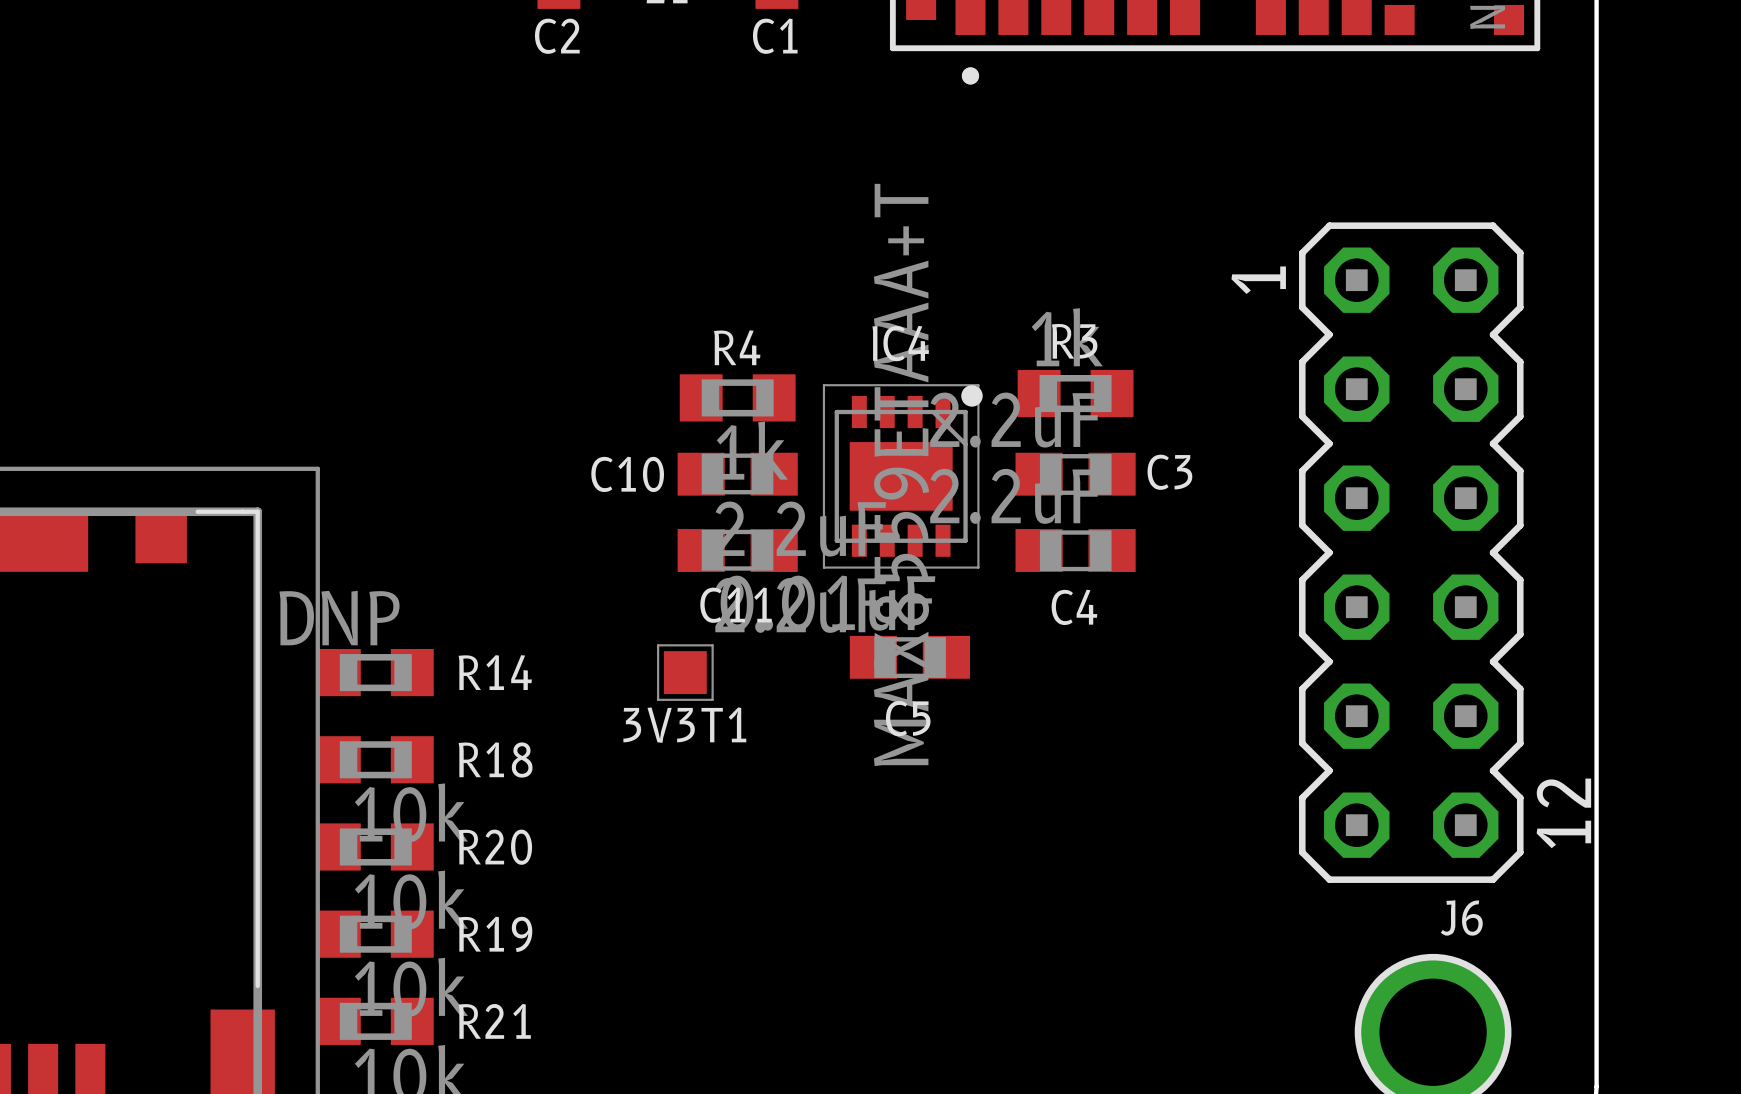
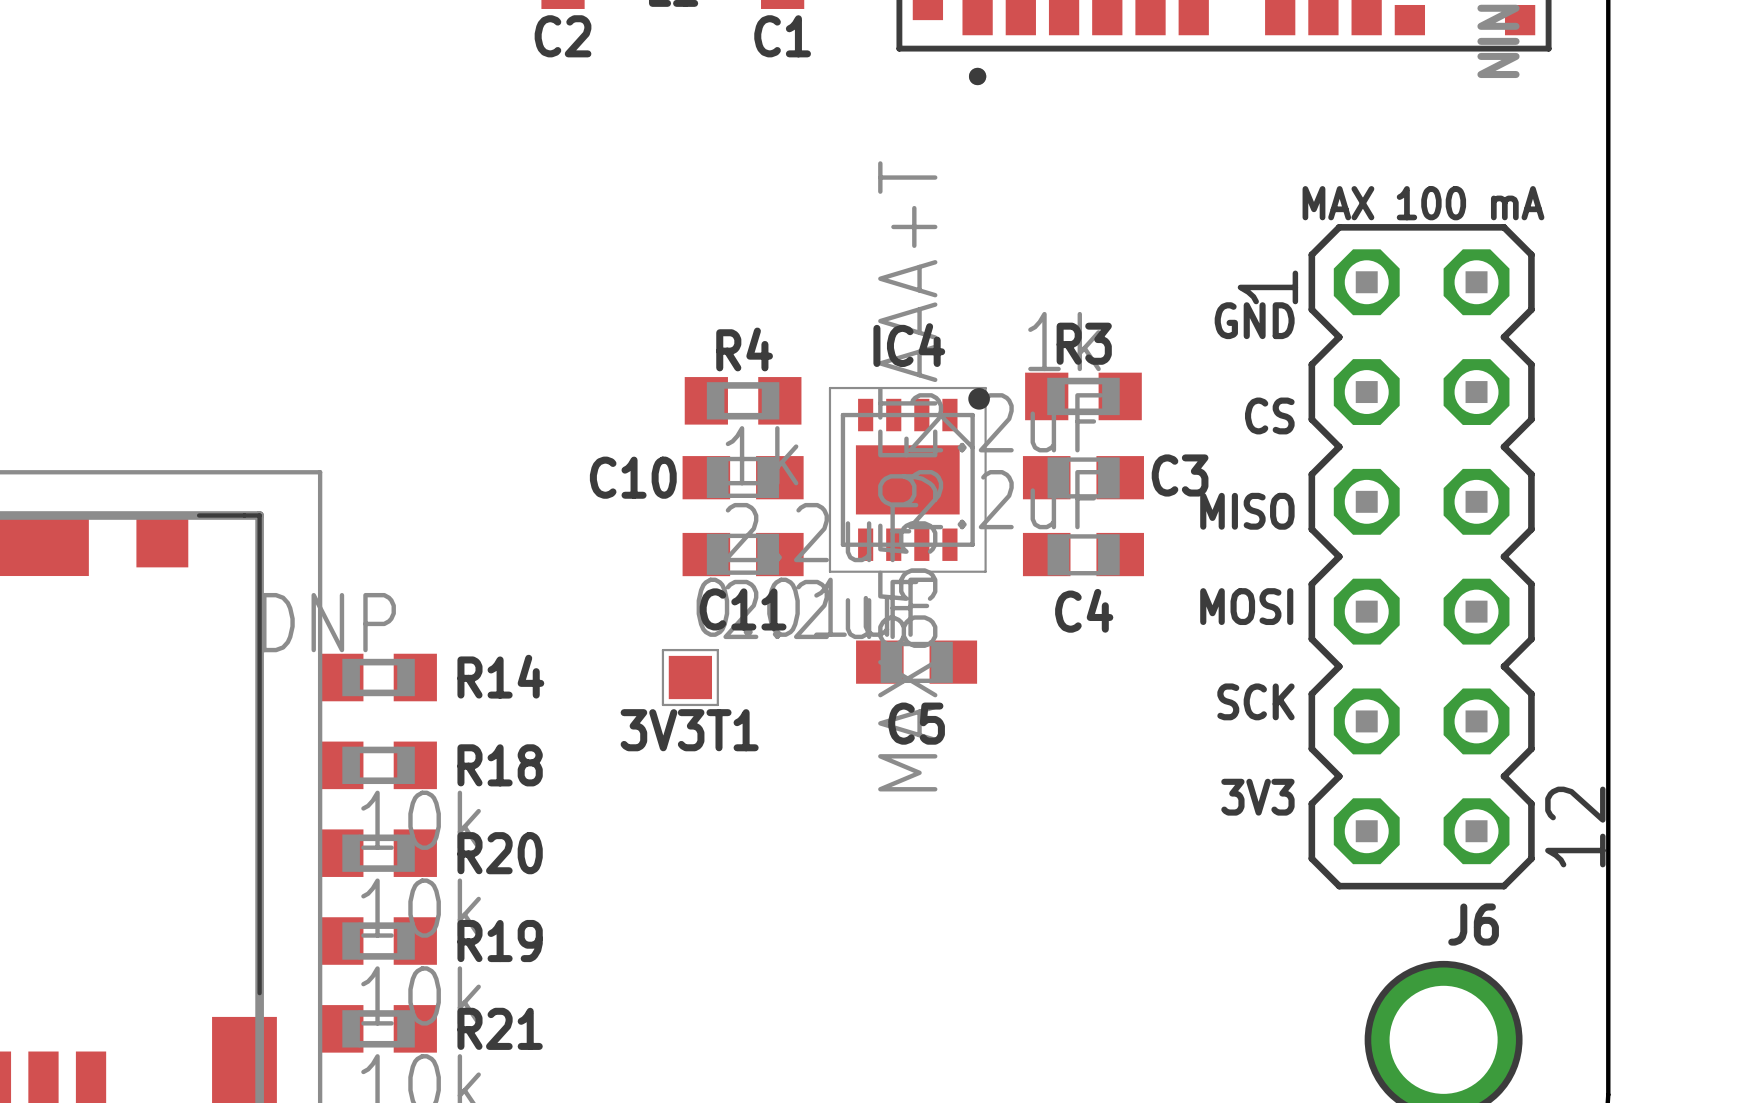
text: none -> MAX 100 mA (1423, 203)
text: none -> GND (1254, 320)
text: none -> CS (1269, 415)
text: none -> MISO (1247, 511)
text: none -> MOSI (1246, 606)
text: none -> SCK (1255, 701)
text: none -> 3V3 (1257, 797)

